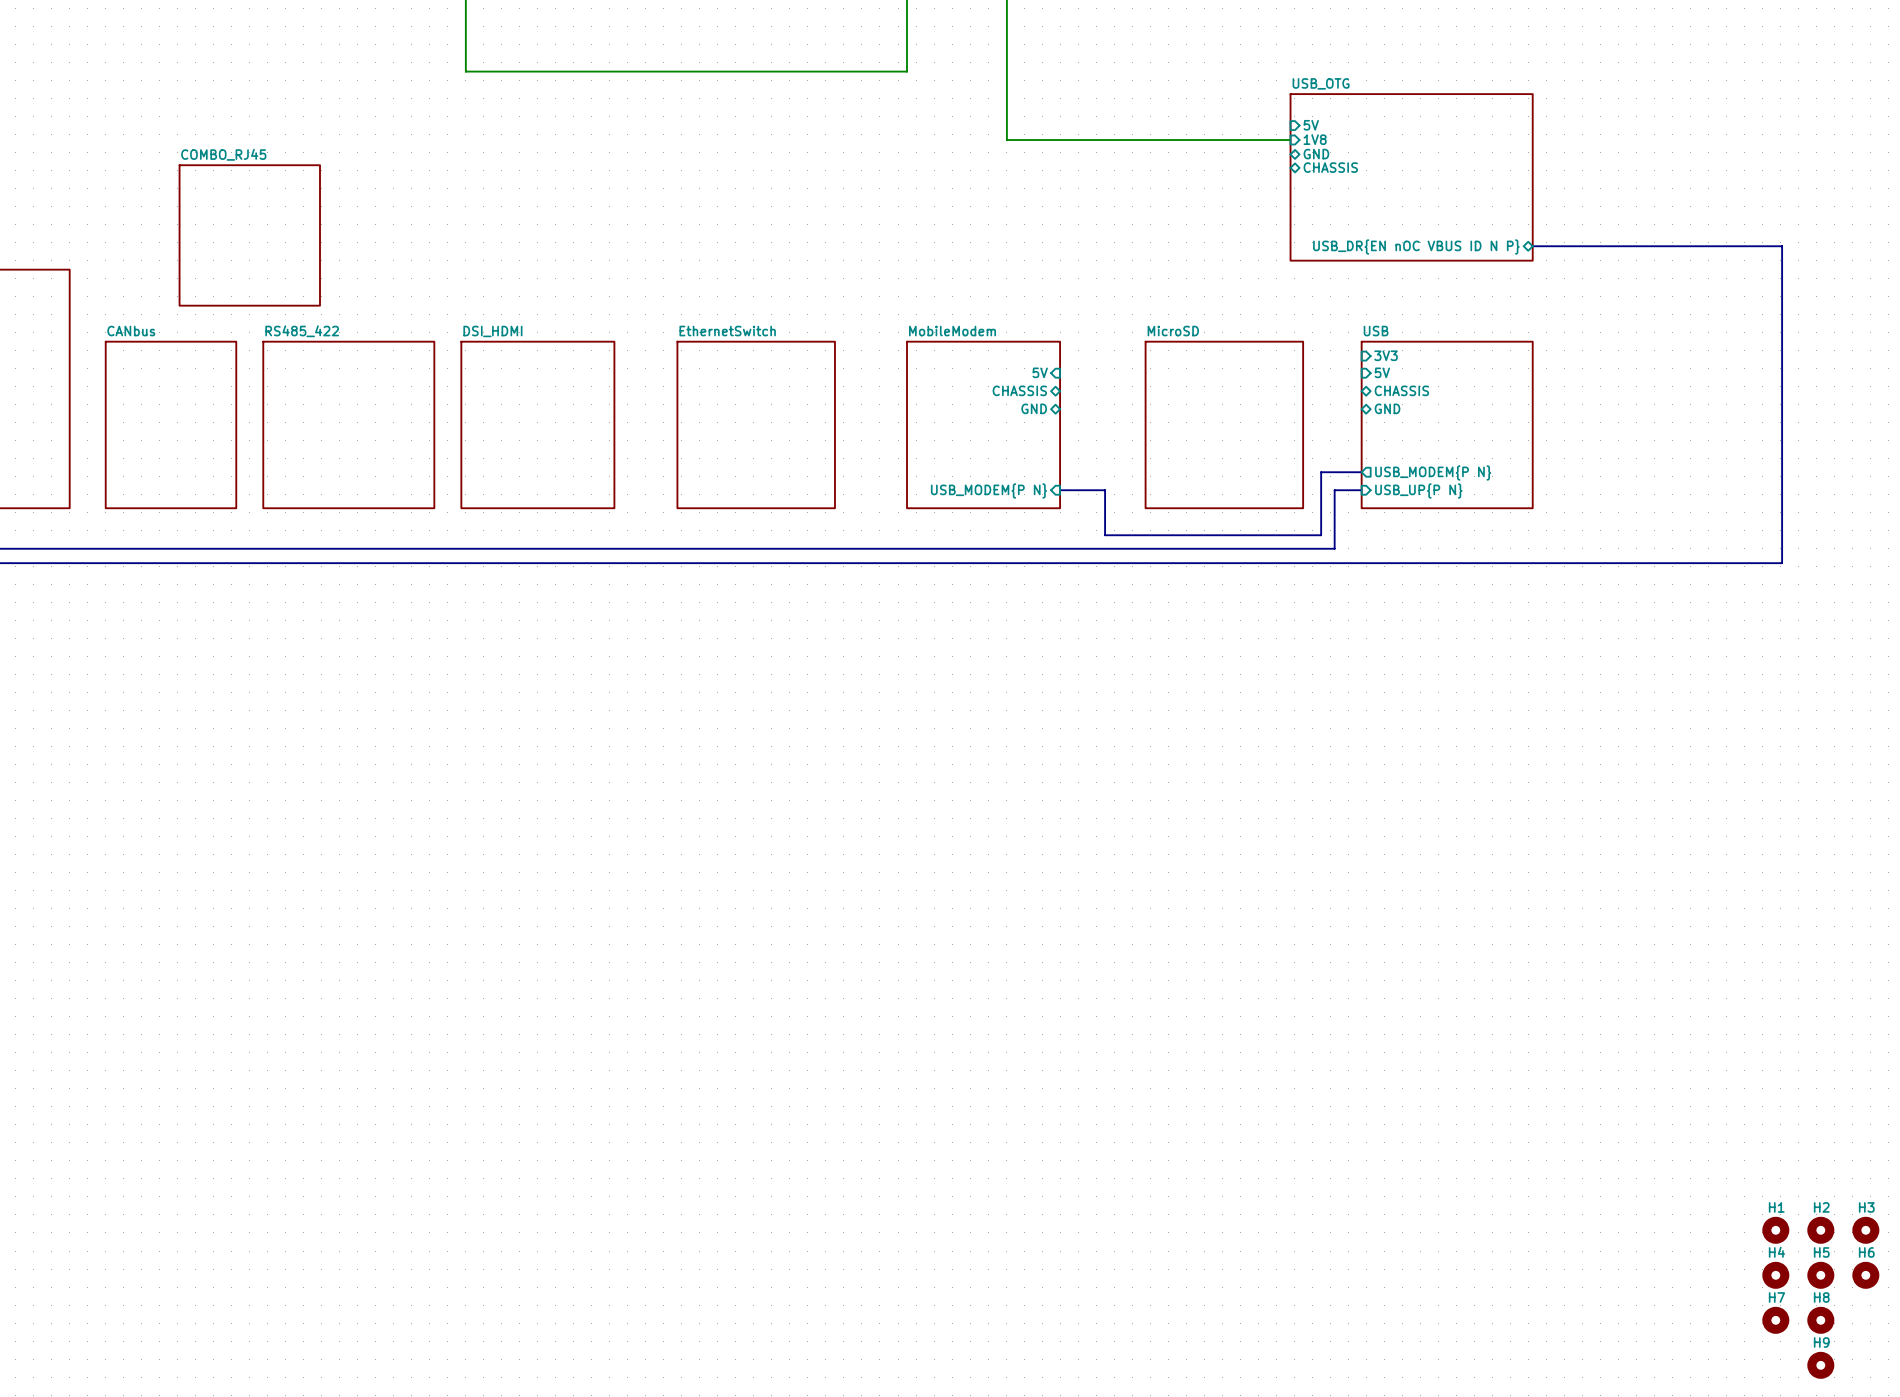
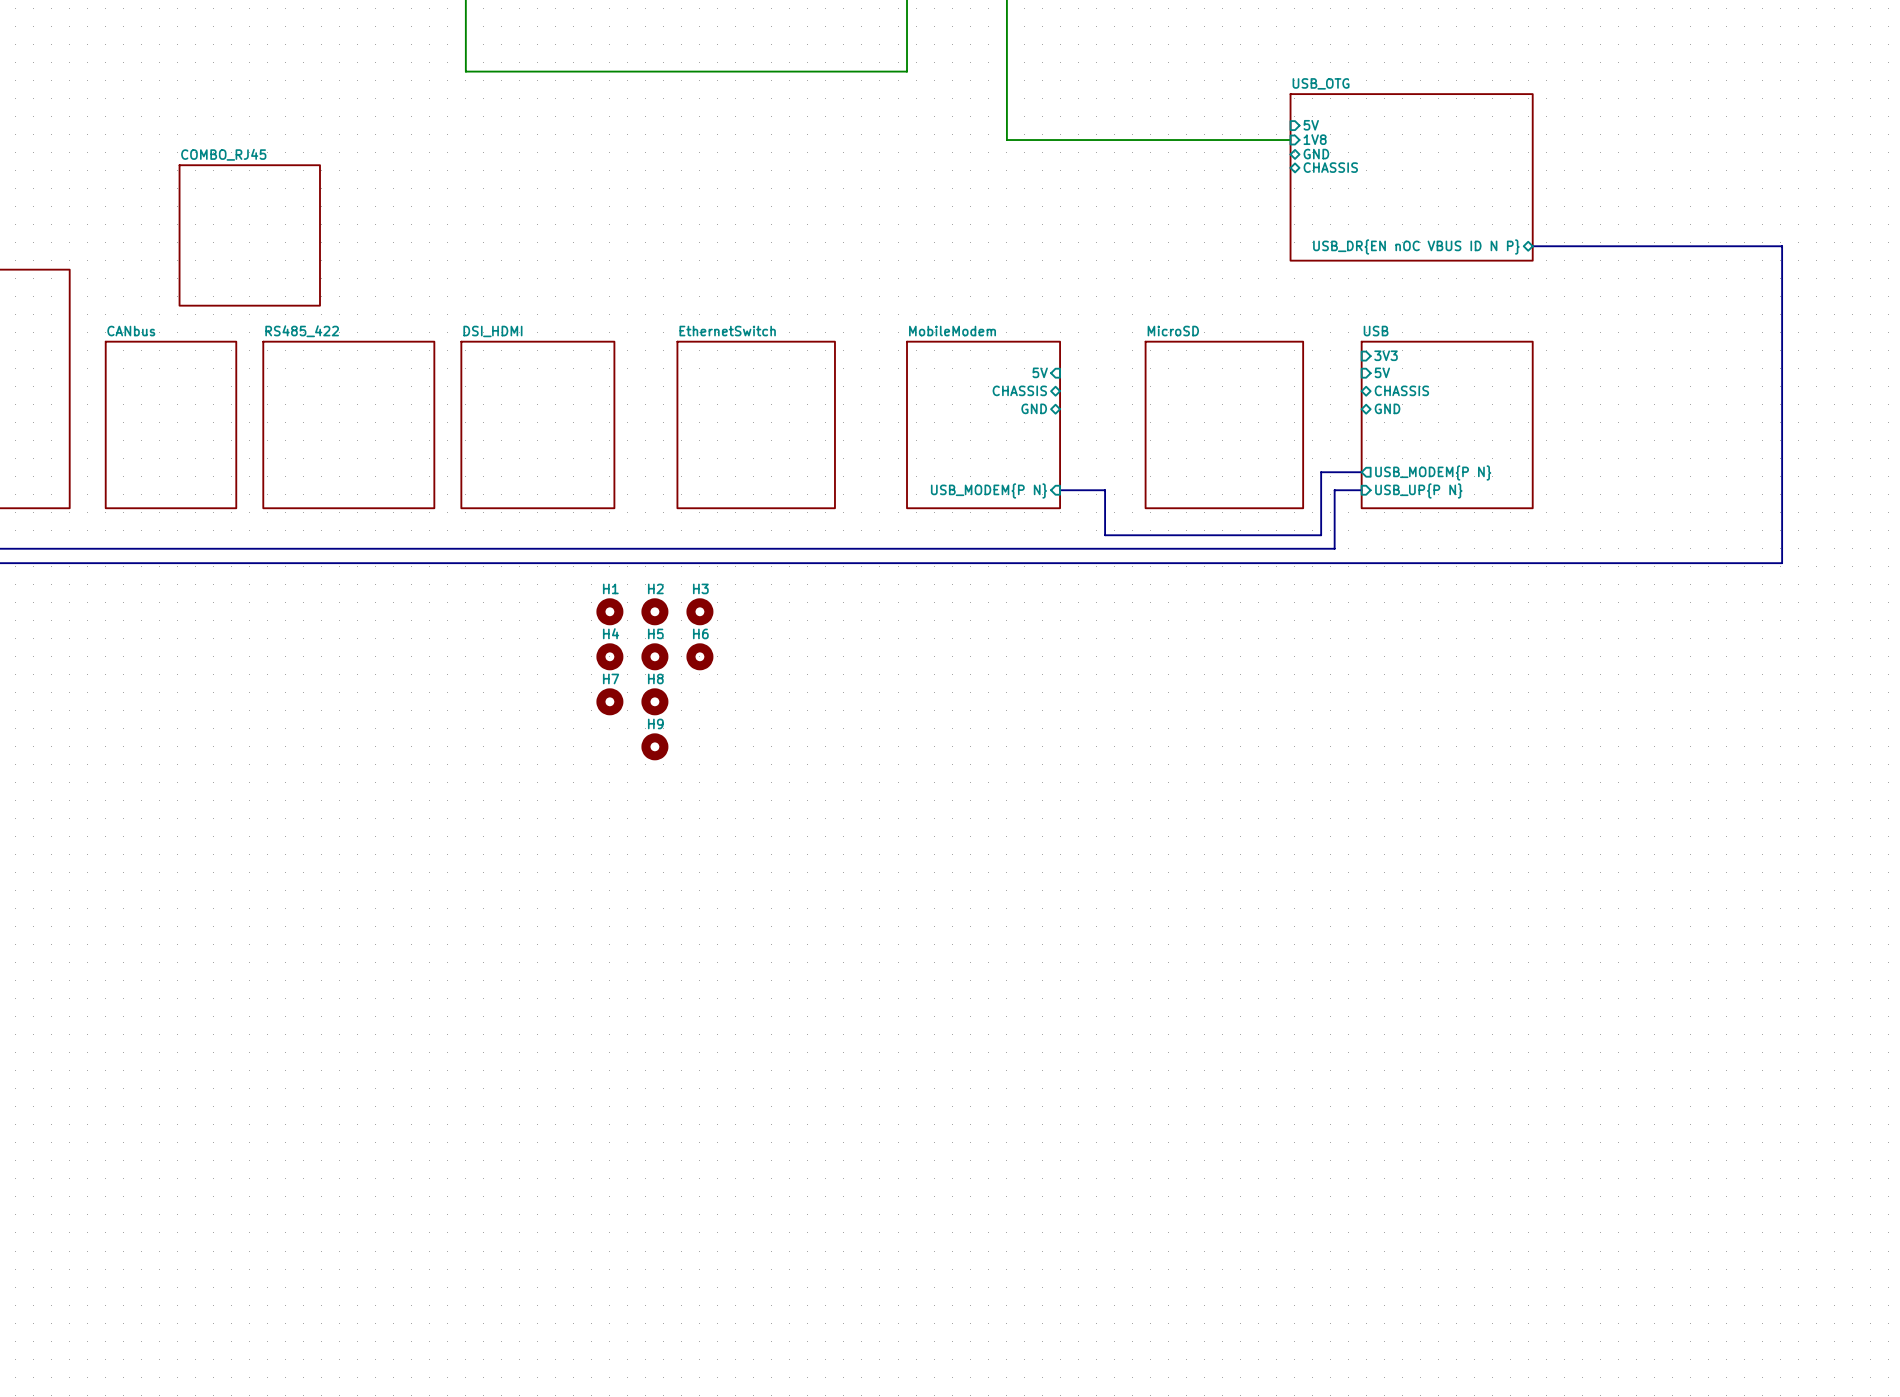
H1 position: (1775, 1230) -> (609, 611)
H2 position: (1820, 1230) -> (654, 611)
H3 position: (1865, 1230) -> (699, 611)
H4 position: (1775, 1275) -> (609, 656)
H5 position: (1820, 1275) -> (654, 656)
H6 position: (1865, 1275) -> (699, 656)
H7 position: (1775, 1320) -> (609, 701)
H8 position: (1820, 1320) -> (654, 701)
H9 position: (1820, 1365) -> (654, 746)

